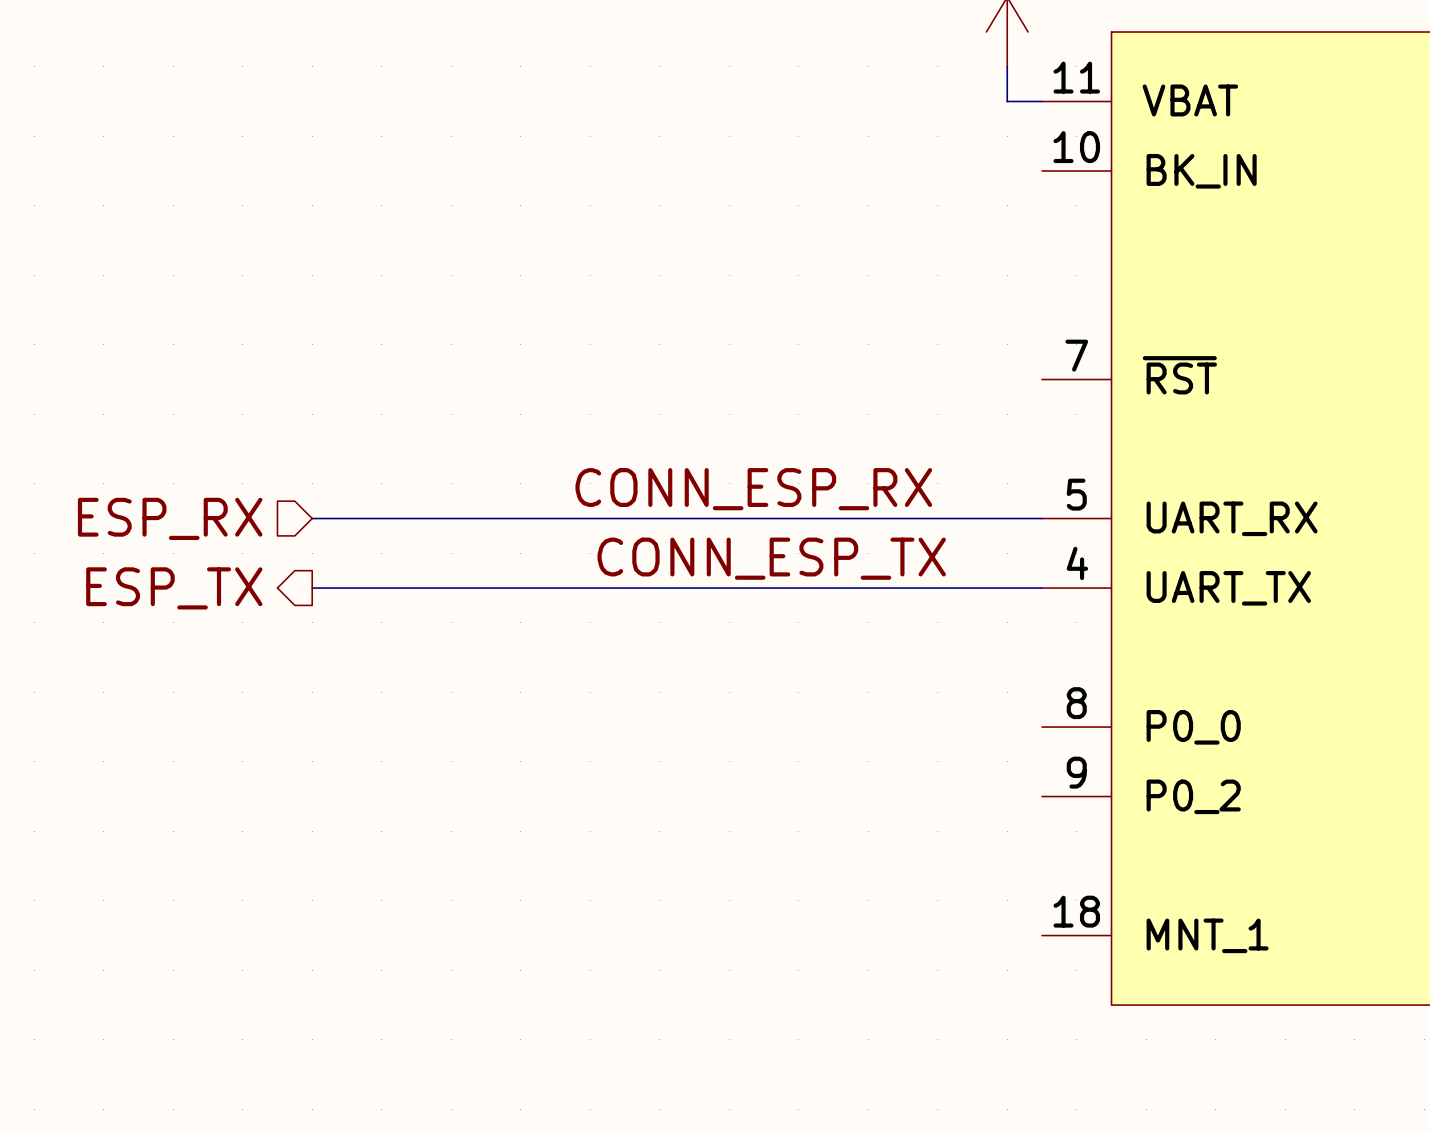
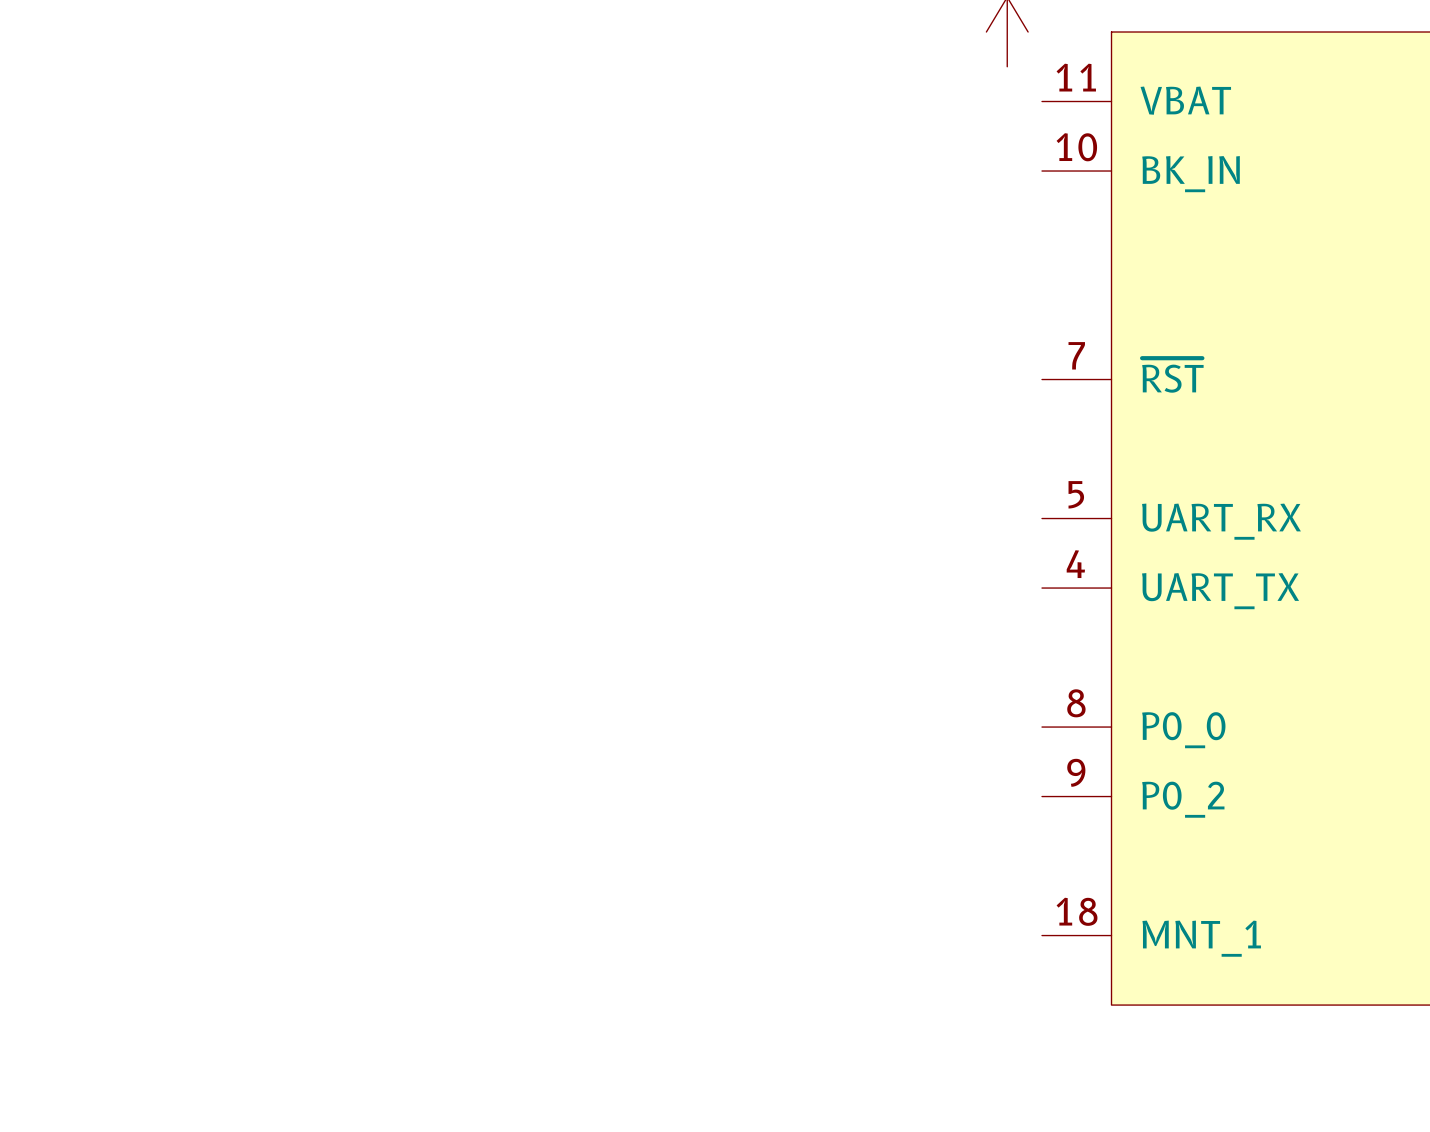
wire: (1007, 66) (1007, 101) (1042, 101) -> none
label: CONN_ESP_RX (753, 489) -> none
hierarchical label: ESP_RX (170, 518) -> none
wire: (312, 518) (1042, 518) -> none
label: CONN_ESP_TX (771, 558) -> none
hierarchical label: ESP_TX (174, 588) -> none
wire: (312, 588) (1042, 588) -> none

